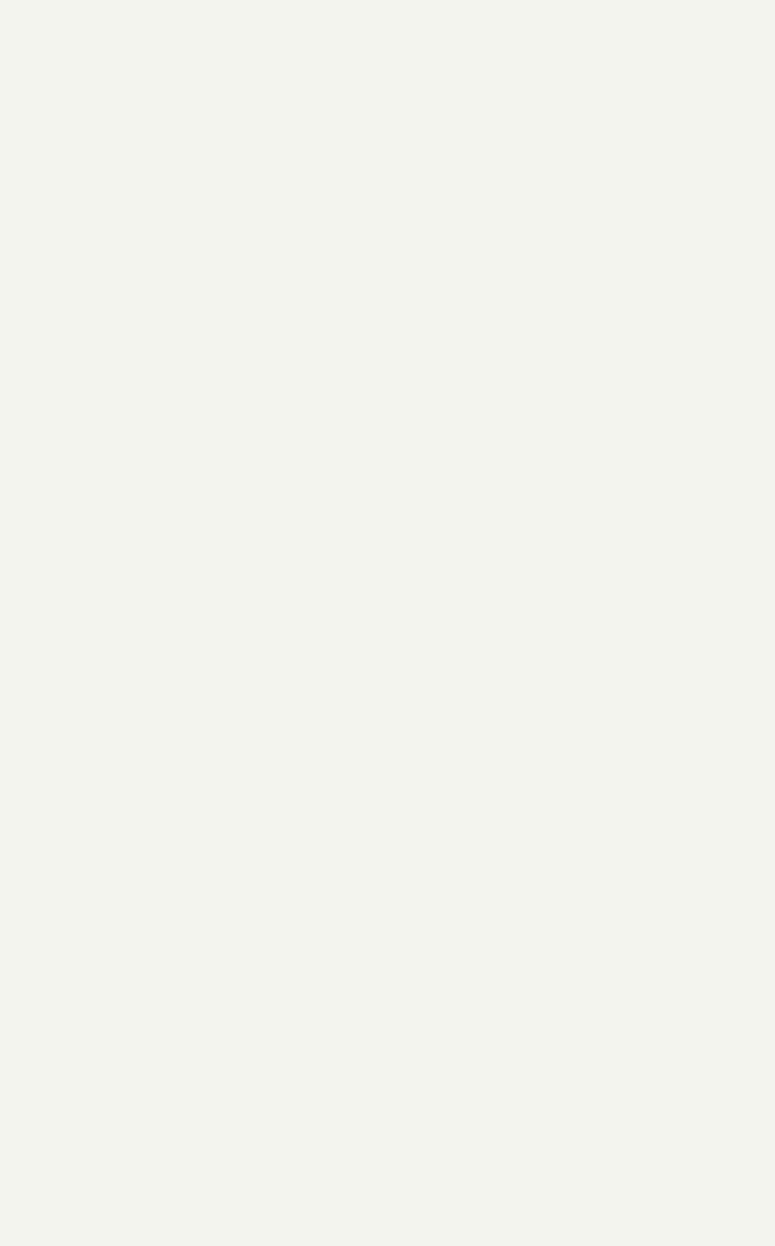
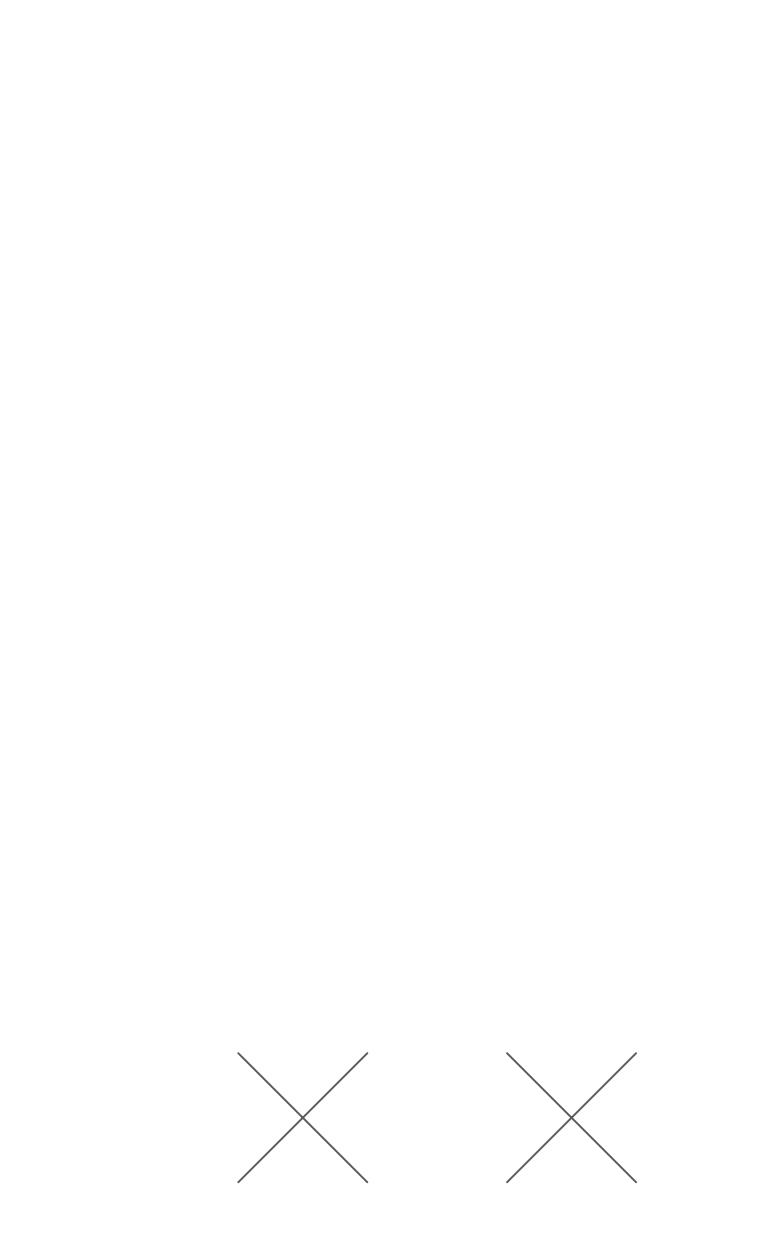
no-connect mark: none -> (302, 1117)
no-connect mark: none -> (571, 1117)

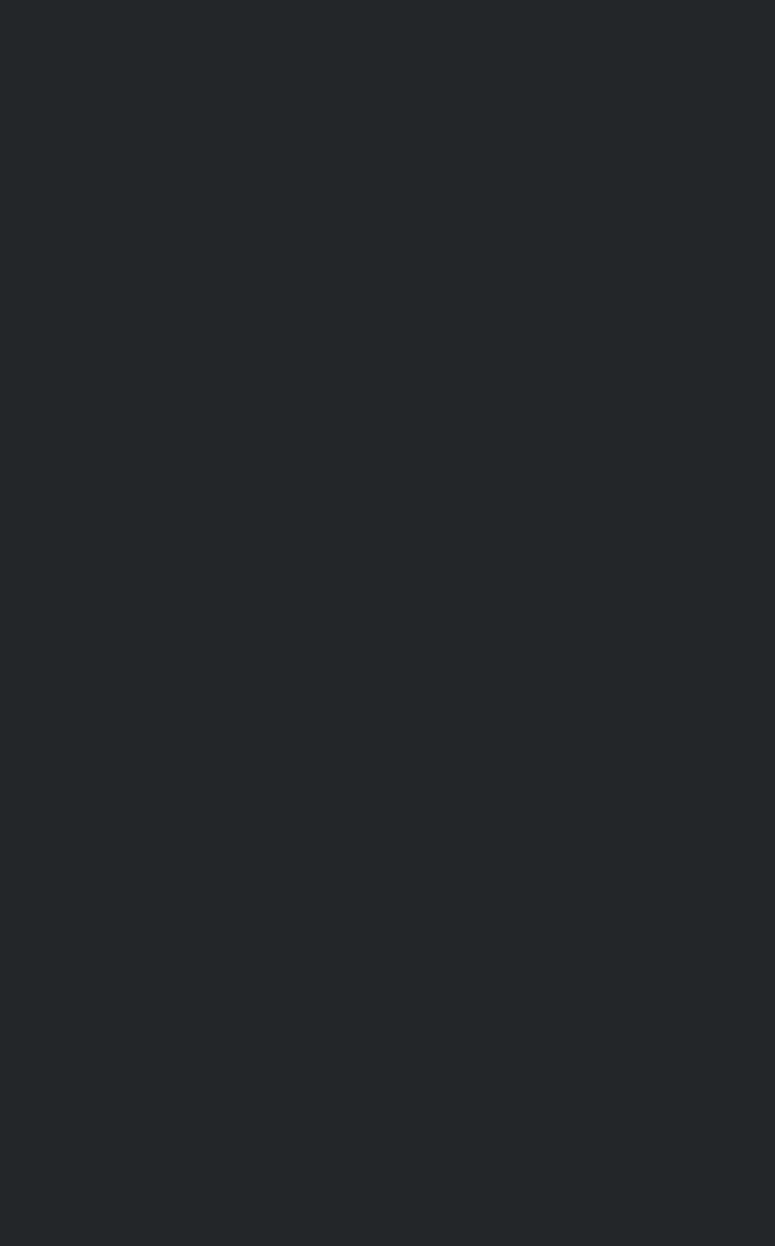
no-connect mark: (302, 1117) -> none
no-connect mark: (571, 1117) -> none

